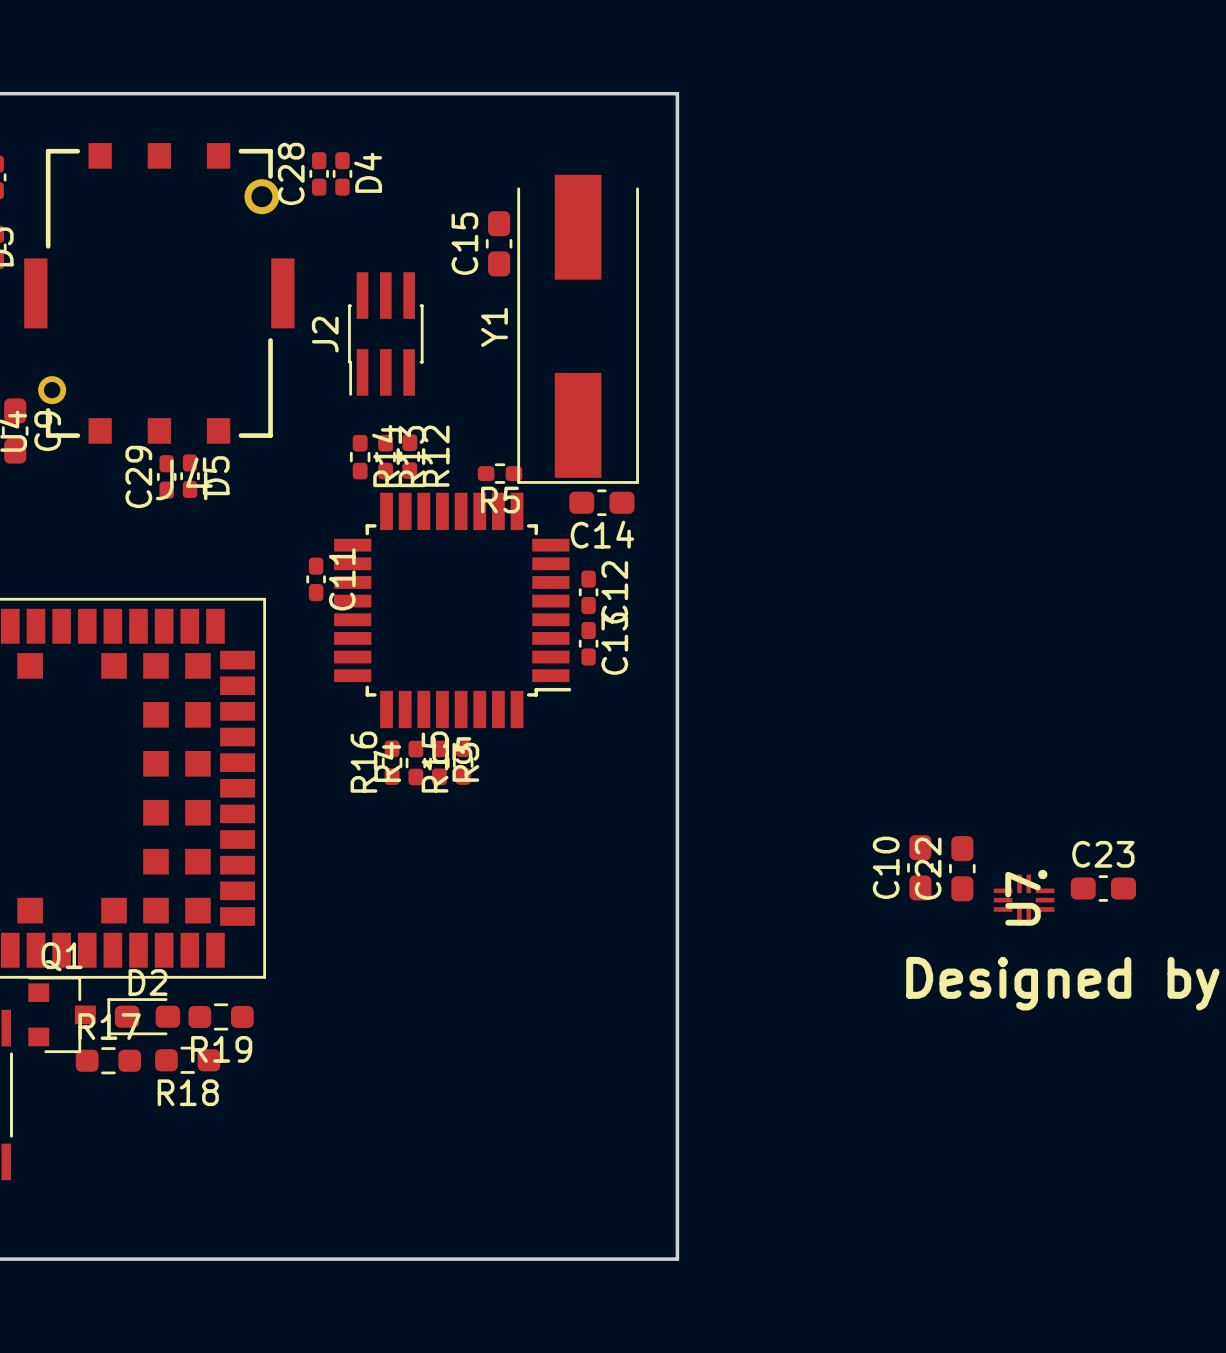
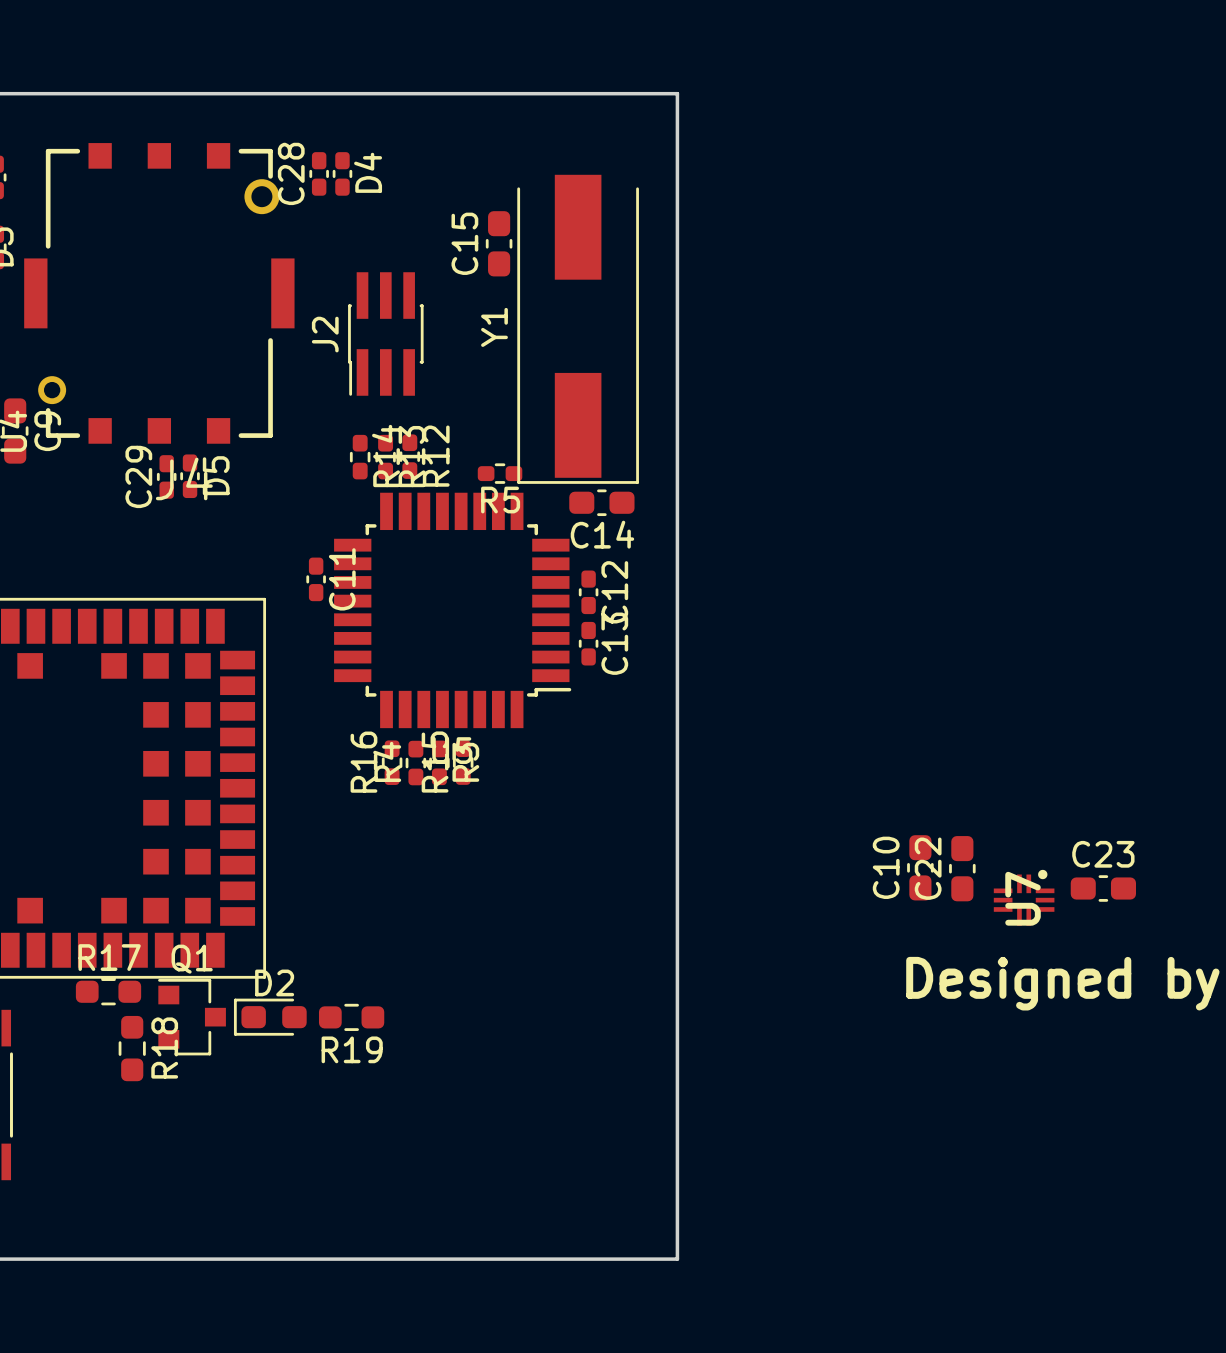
Q1 position: (61, 1014) -> (192, 1017)
D2 position: (143, 1016) -> (270, 1017)
R19 position: (221, 1016) -> (351, 1017)
R17 position: (108, 1060) -> (108, 991)
R18 rotation: 0° (187, 1060) -> 90° clockwise (132, 1048)
R18 position: (187, 1060) -> (132, 1048)
R18 name position: R18 (188, 1092) -> R18 (164, 1048)

